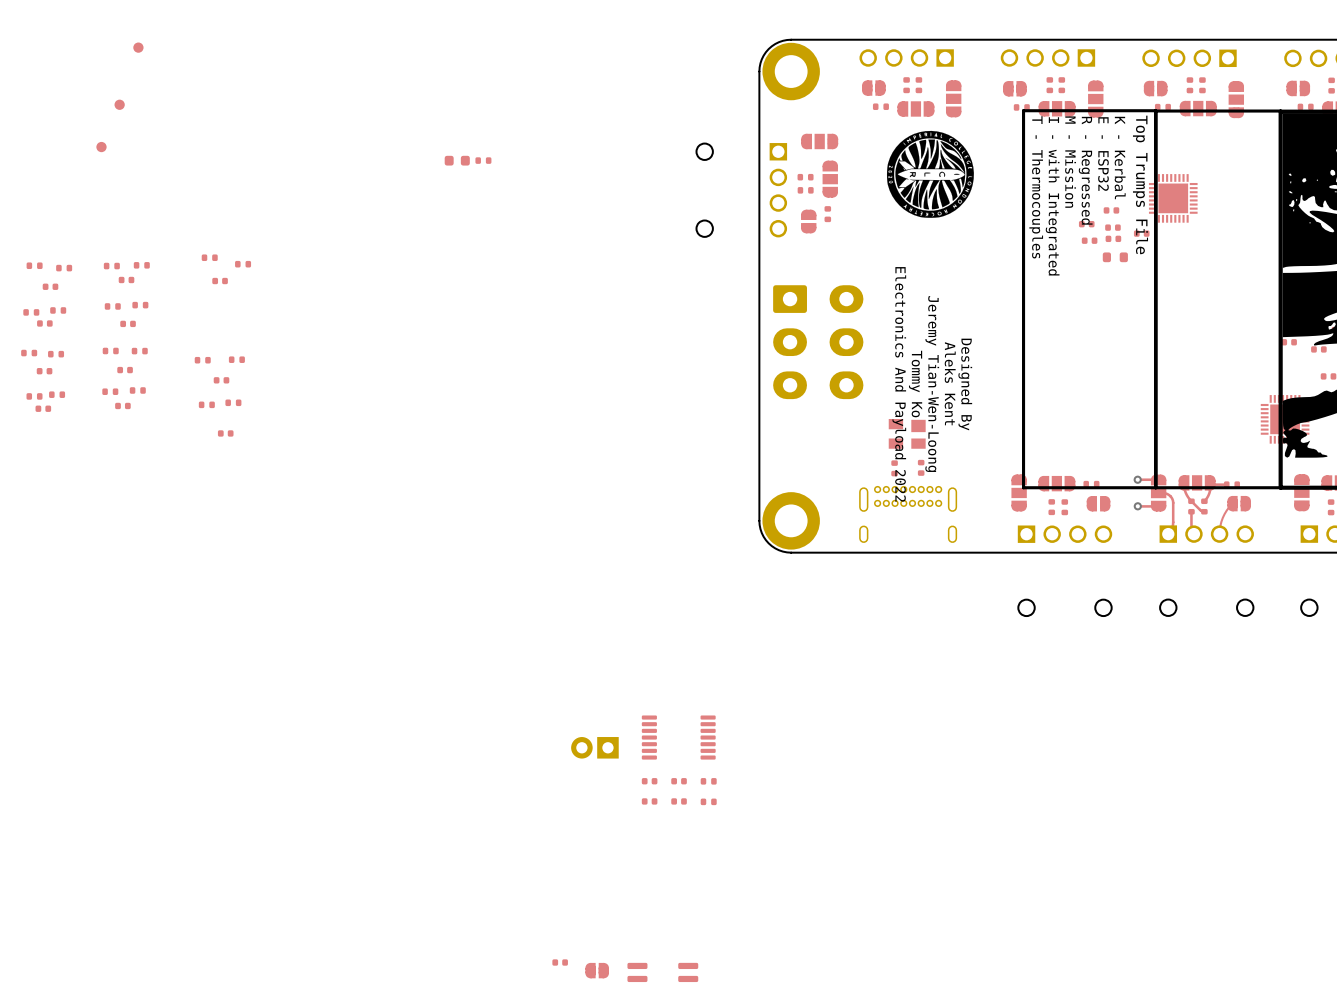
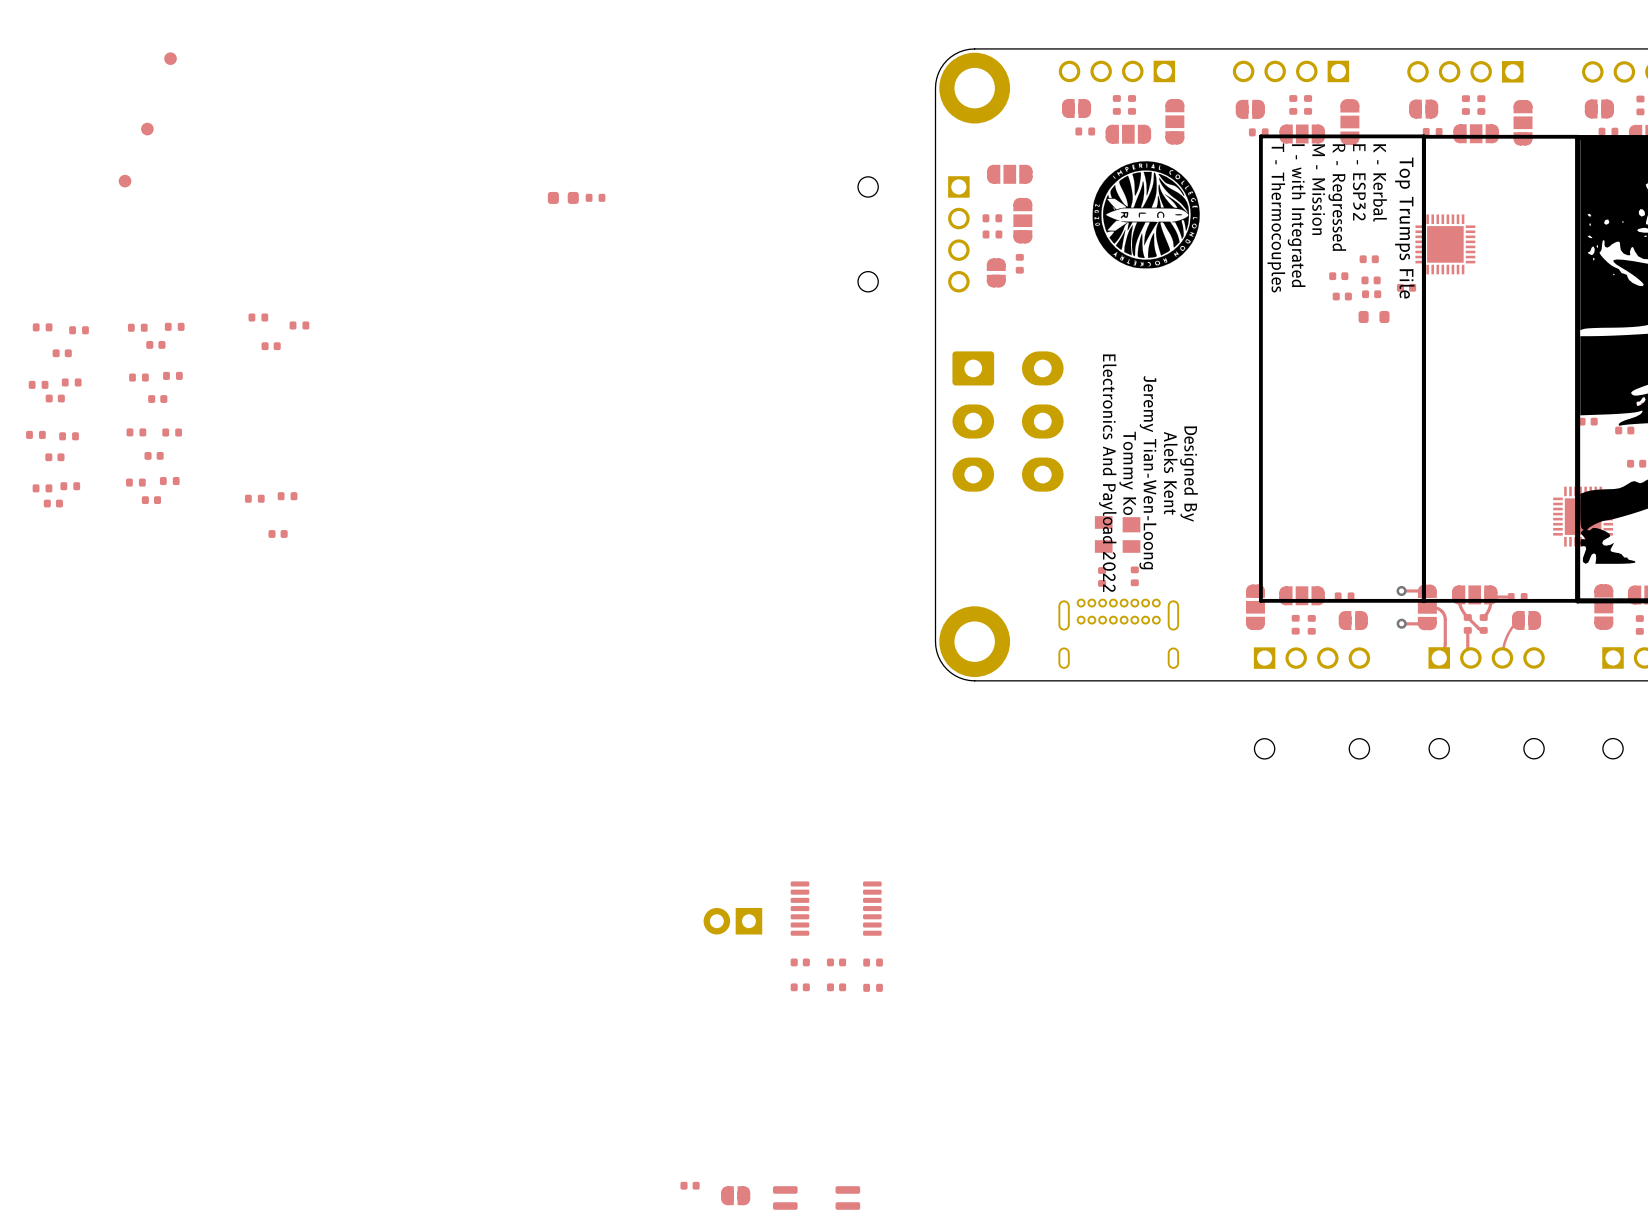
part: (236, 359) -> none
part: (202, 360) -> none
part: (221, 380) -> none

